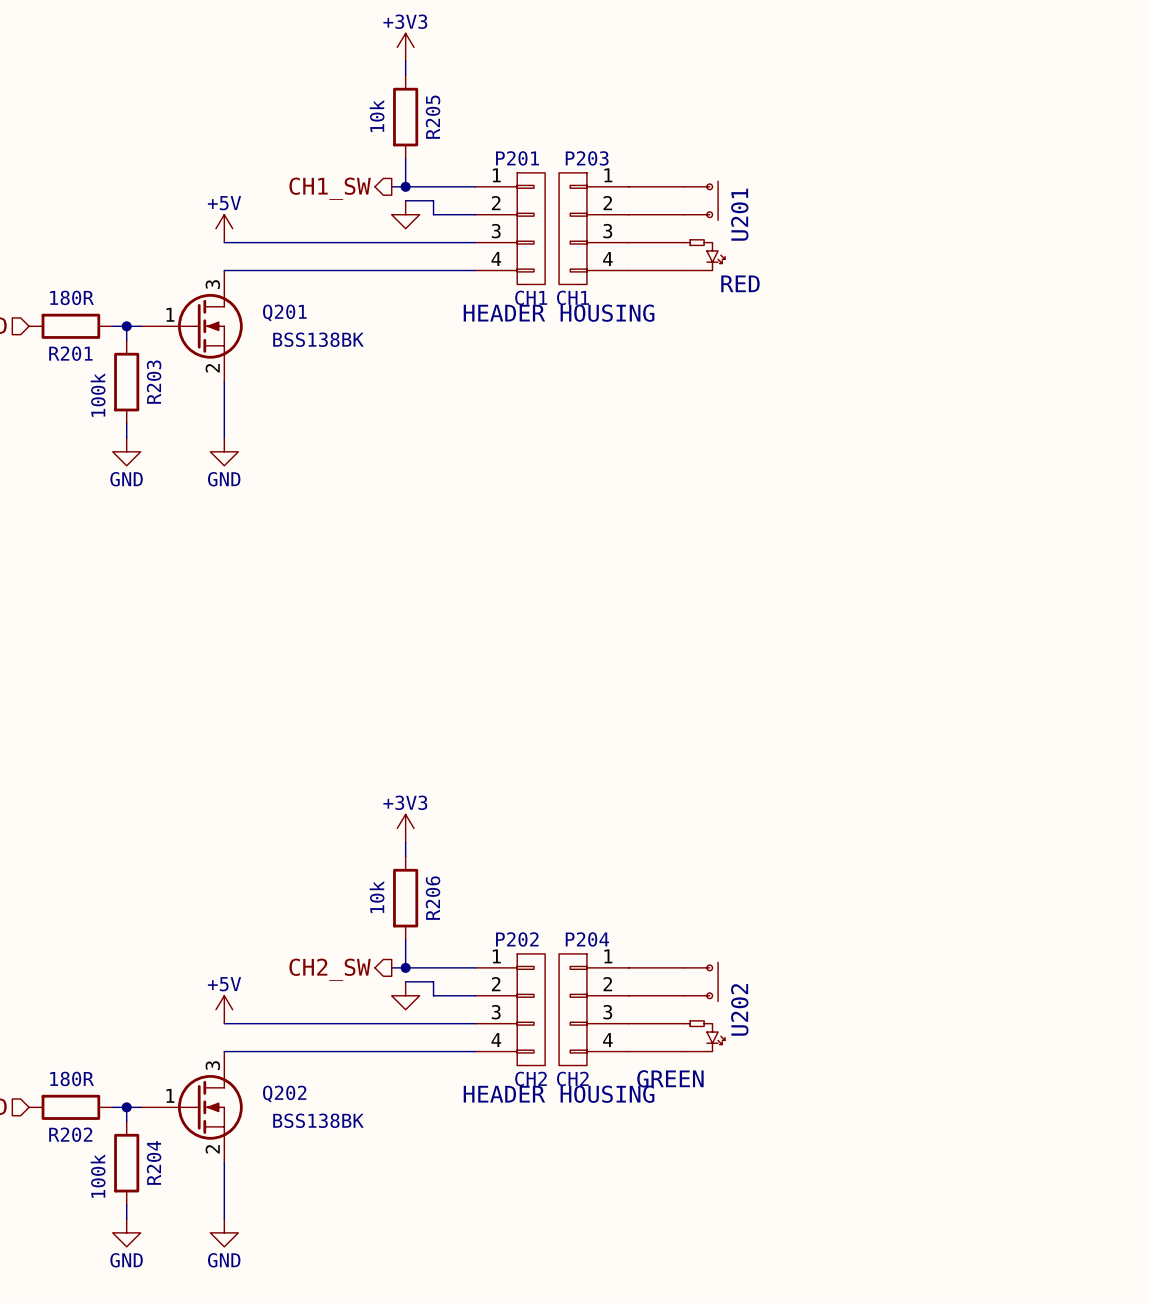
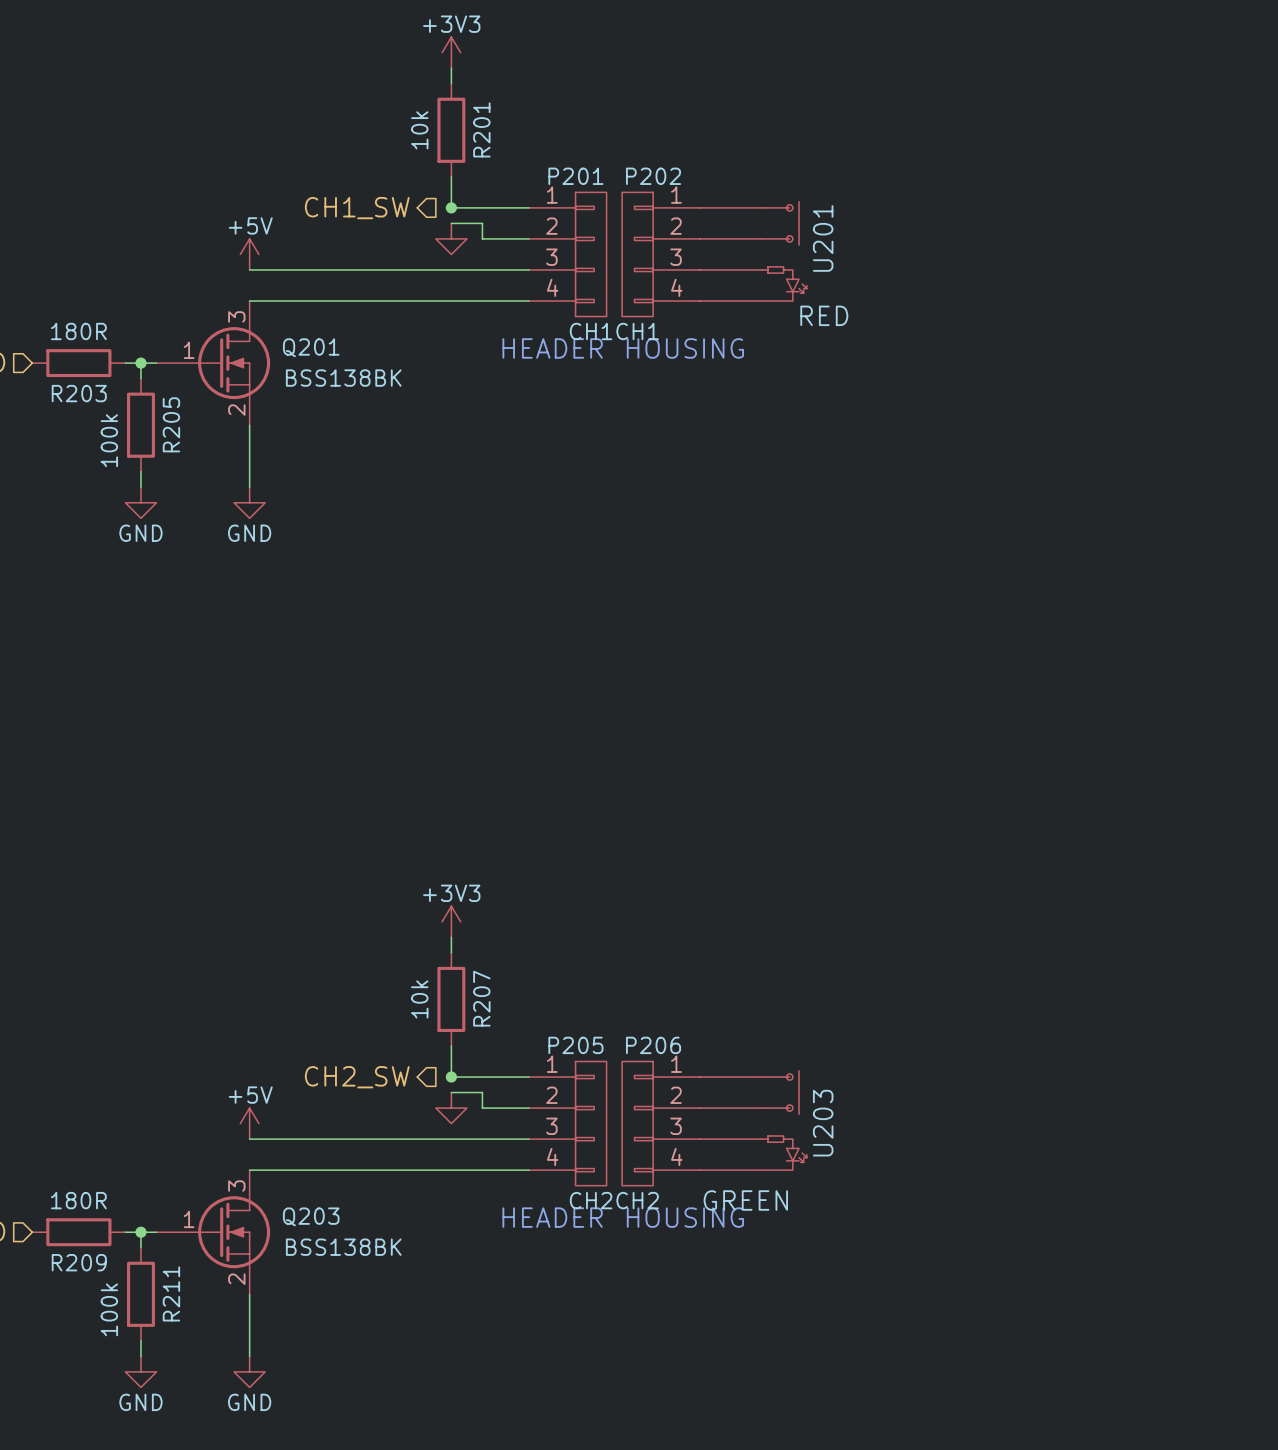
R205 name: R205 (433, 117) -> R201 (481, 129)
P203 name: P203 (587, 158) -> P202 (653, 176)
wire: (391, 186) (405, 186) -> none
R201 name: R201 (70, 353) -> R203 (79, 393)
R203 name: R203 (154, 382) -> R205 (171, 424)
R206 name: R206 (433, 898) -> R207 (481, 998)
P202 name: P202 (517, 939) -> P205 (575, 1045)
P204 name: P204 (587, 939) -> P206 (653, 1045)
wire: (391, 967) (405, 967) -> none
U202 name: U202 (739, 1009) -> U203 (823, 1123)
Q202 name: Q202 (284, 1094) -> Q203 (311, 1216)
R202 name: R202 (70, 1134) -> R209 (79, 1262)
R204 name: R204 (154, 1162) -> R211 (171, 1293)

